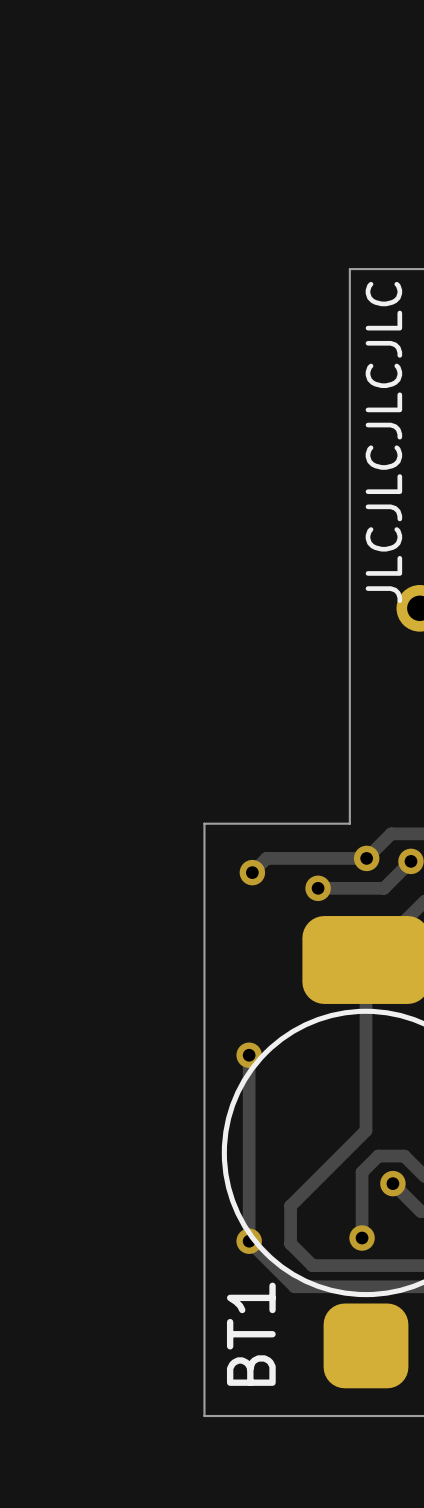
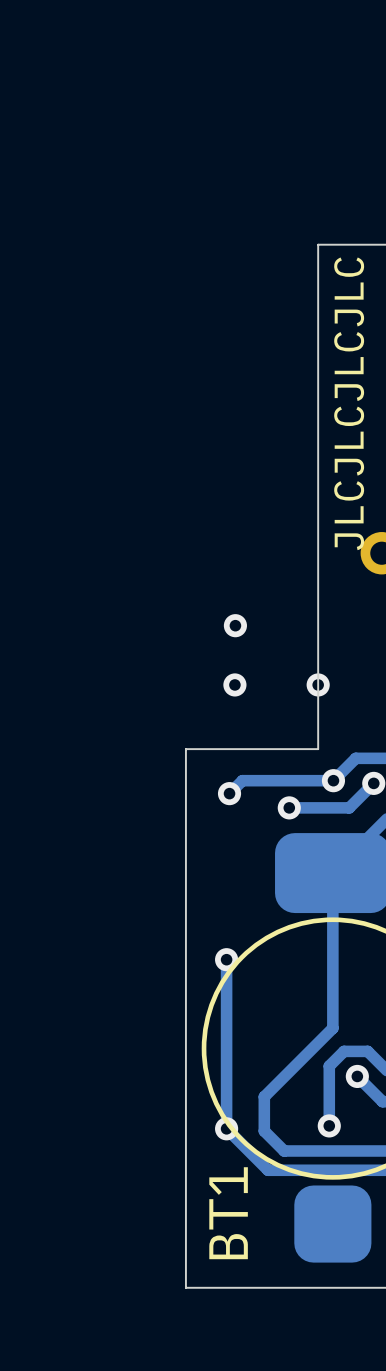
via: none -> (235, 625)
via: none -> (234, 684)
via: none -> (318, 684)

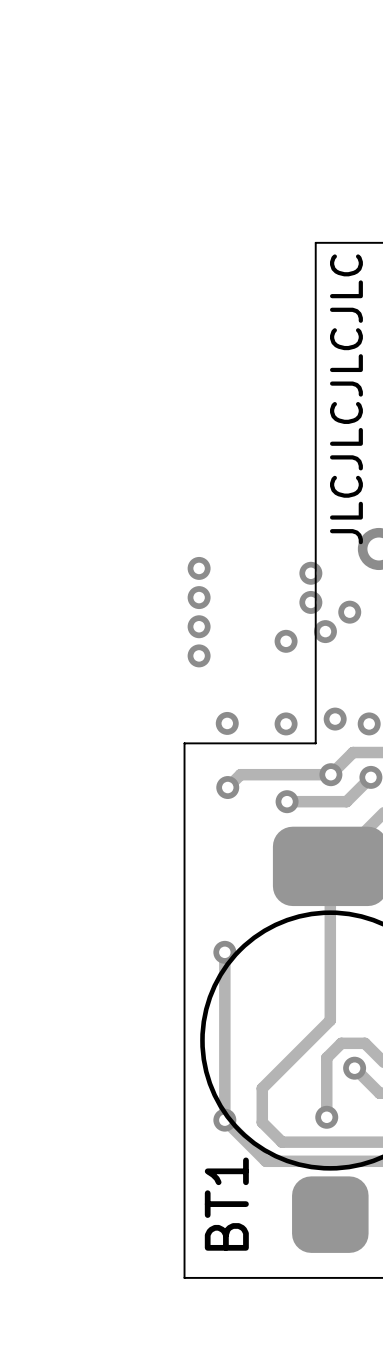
via: none -> (199, 568)
via: none -> (310, 573)
via: none -> (199, 597)
via: none -> (310, 602)
via: none -> (349, 612)
via: (235, 625) -> none
via: none -> (199, 626)
via: none -> (325, 631)
via: none -> (286, 641)
via: none -> (199, 655)
via: (234, 684) -> none
via: (318, 684) -> none
via: none -> (335, 719)
via: none -> (227, 723)
via: none -> (286, 723)
via: none -> (369, 723)

